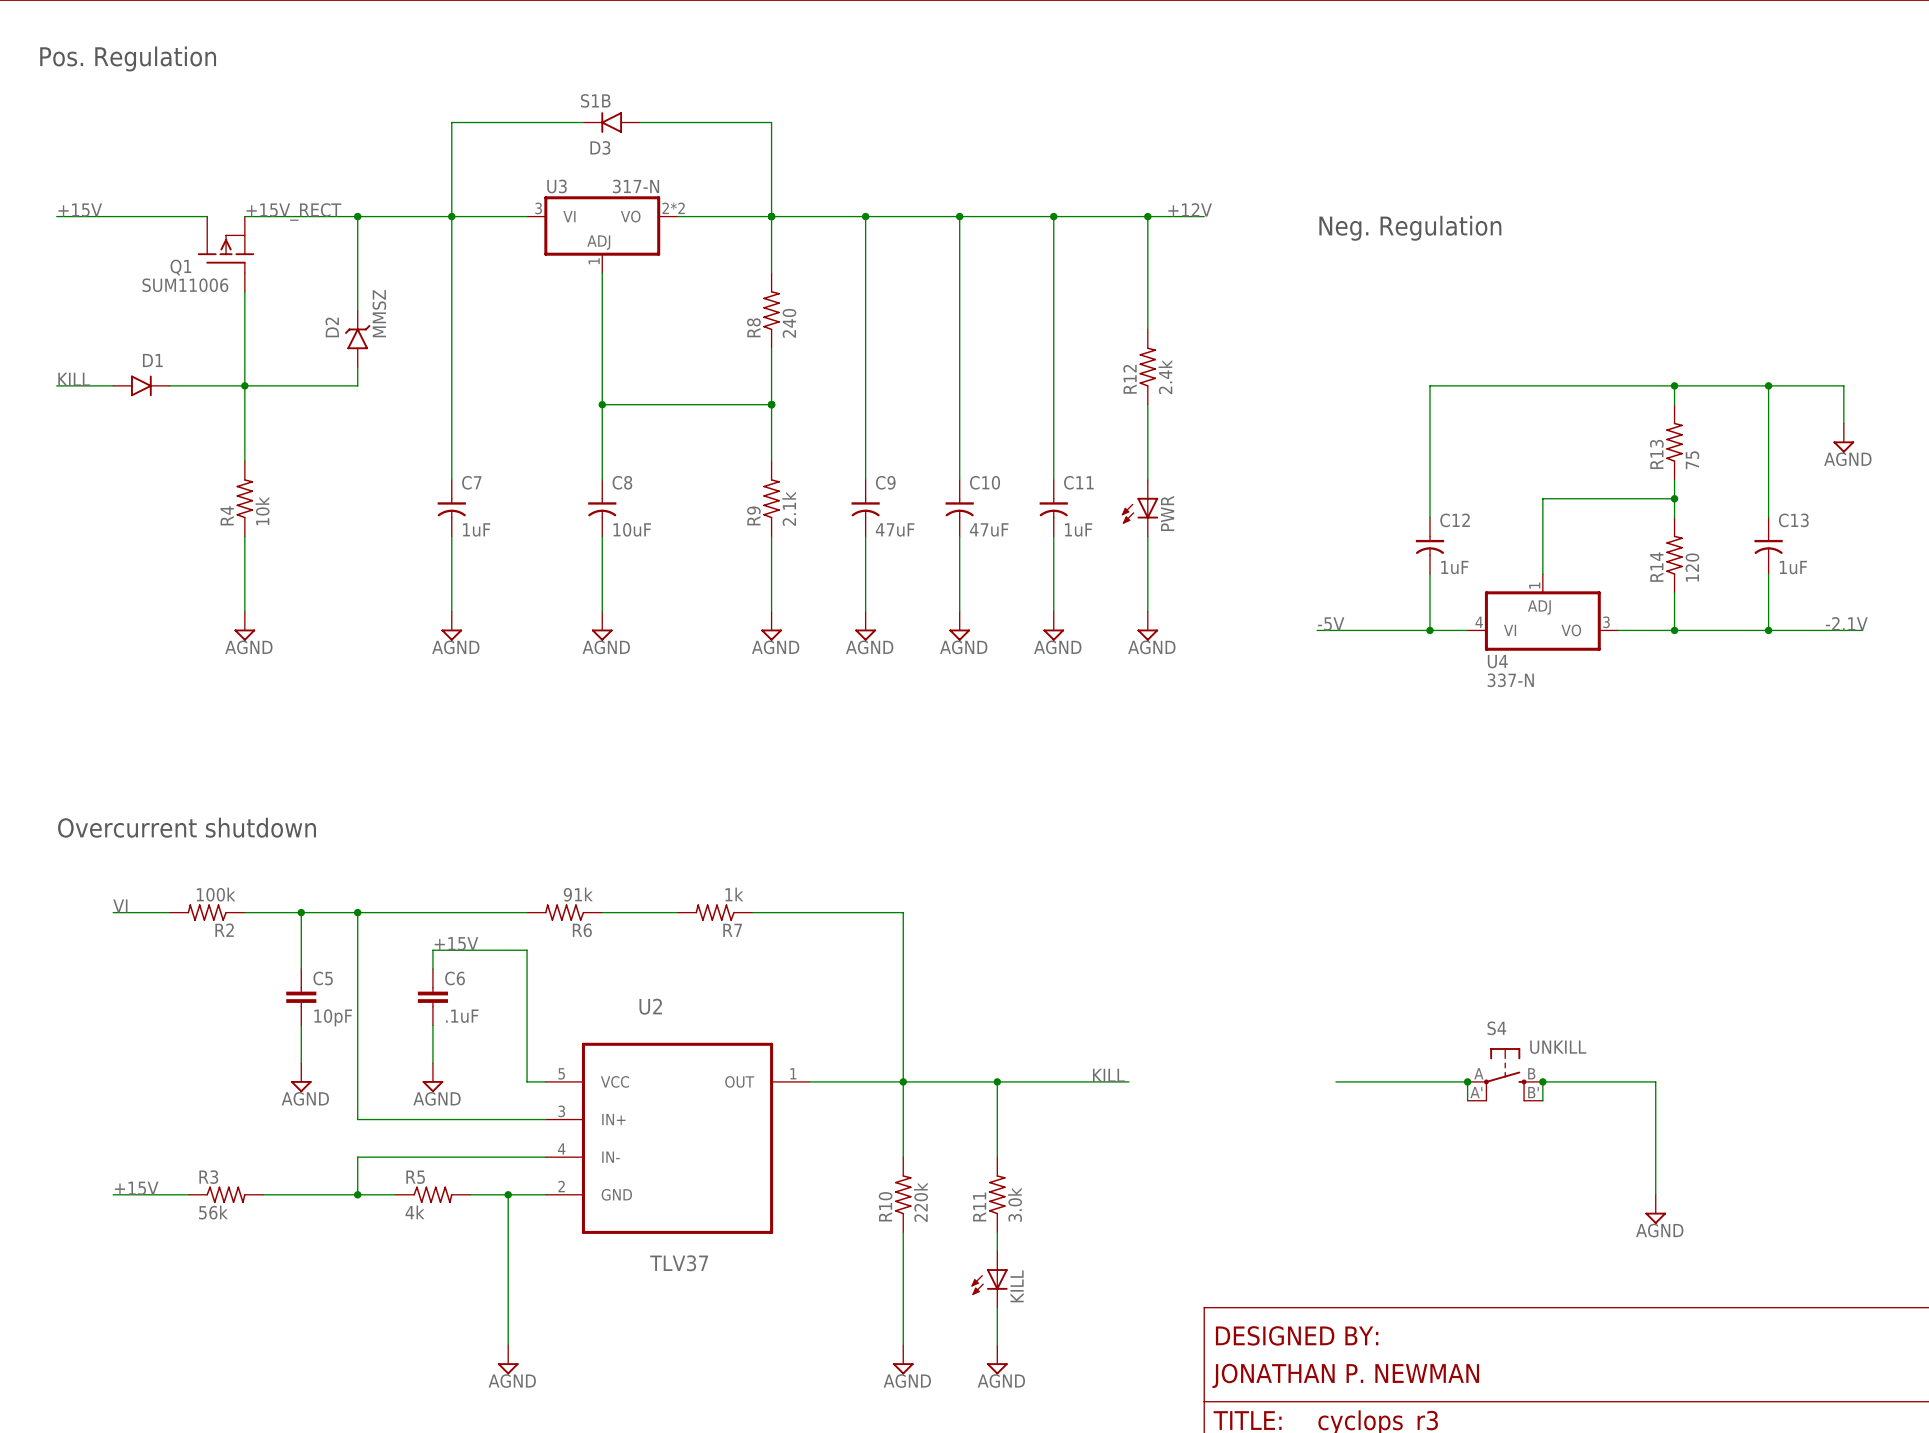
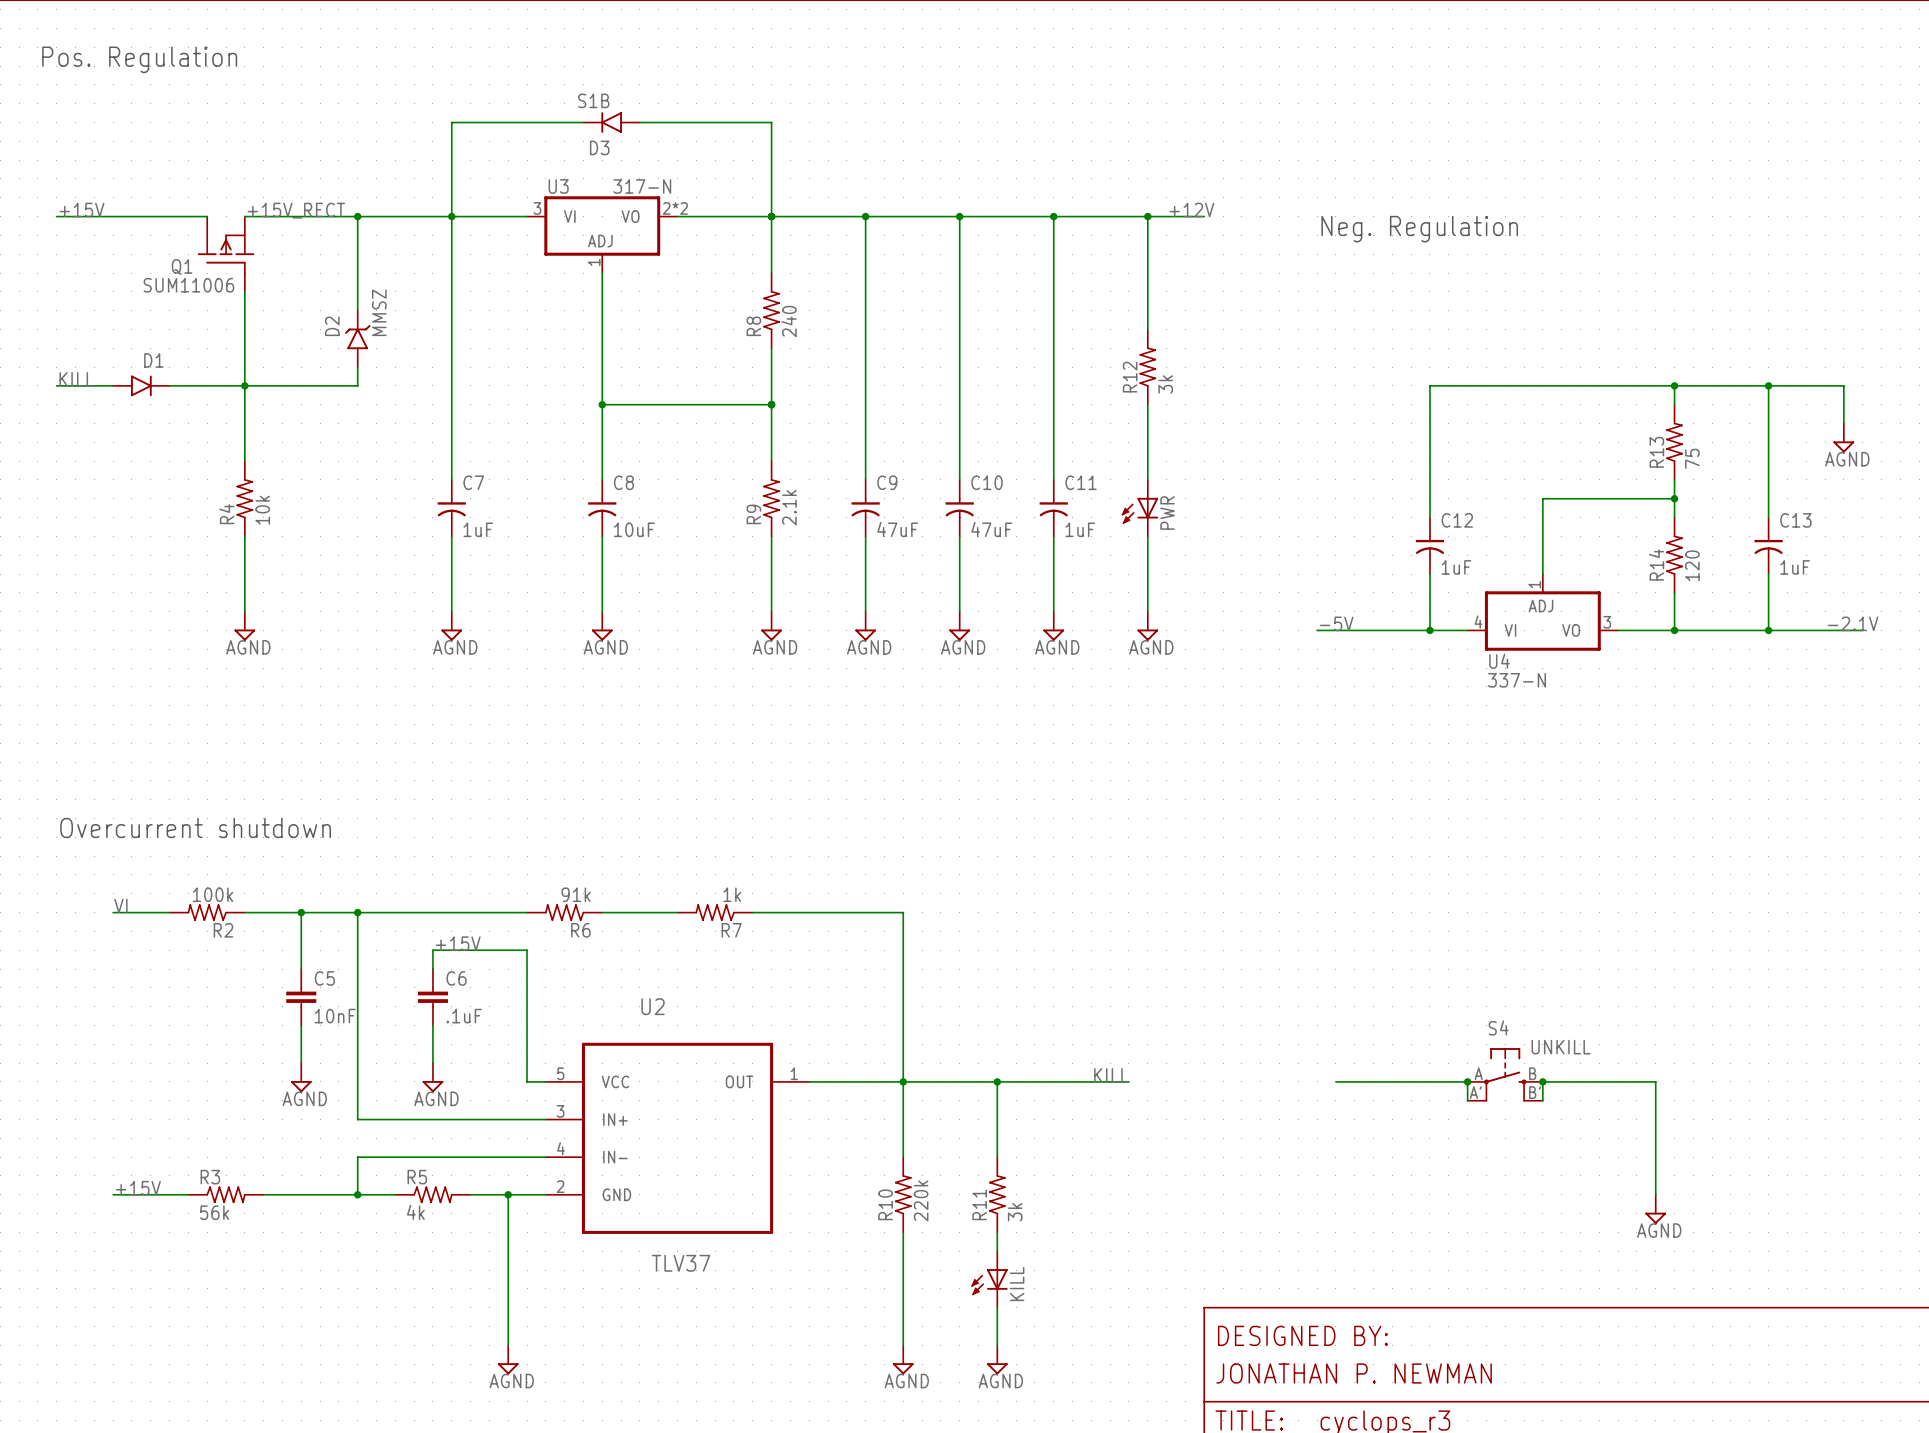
R12 value: 2.4k (1165, 377) -> 3k (1165, 384)
C5 value: 10pF (333, 1017) -> 10nF (335, 1016)
R11 value: 3.0k (1015, 1204) -> 3k (1015, 1212)

